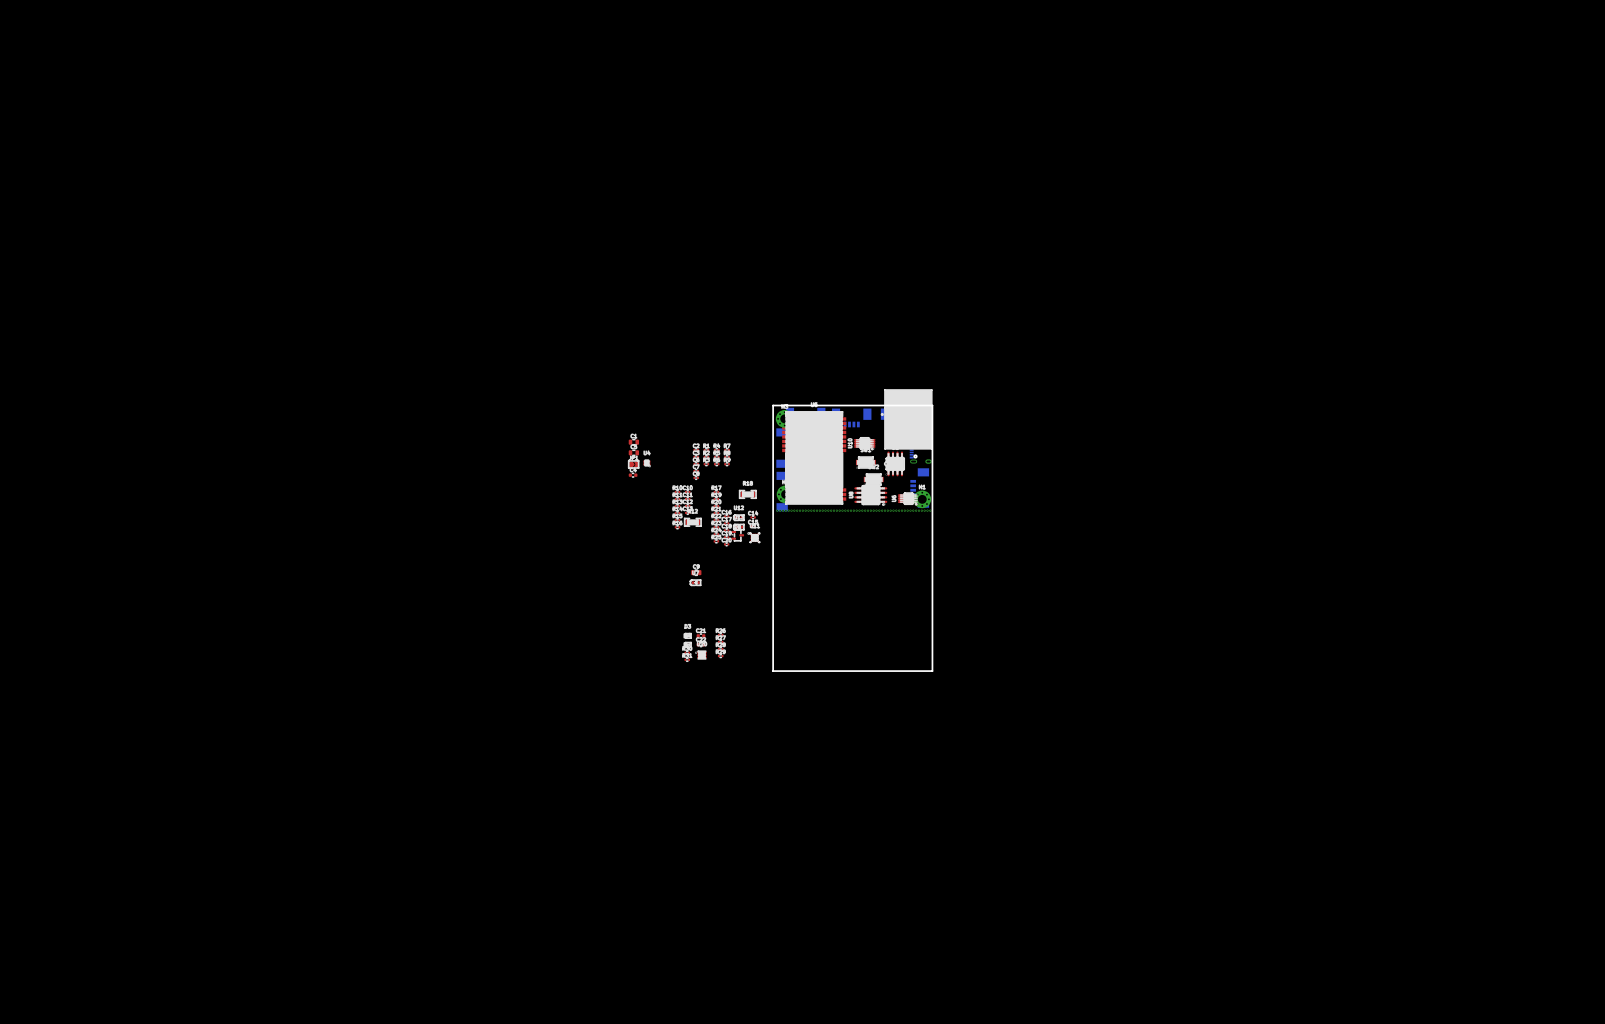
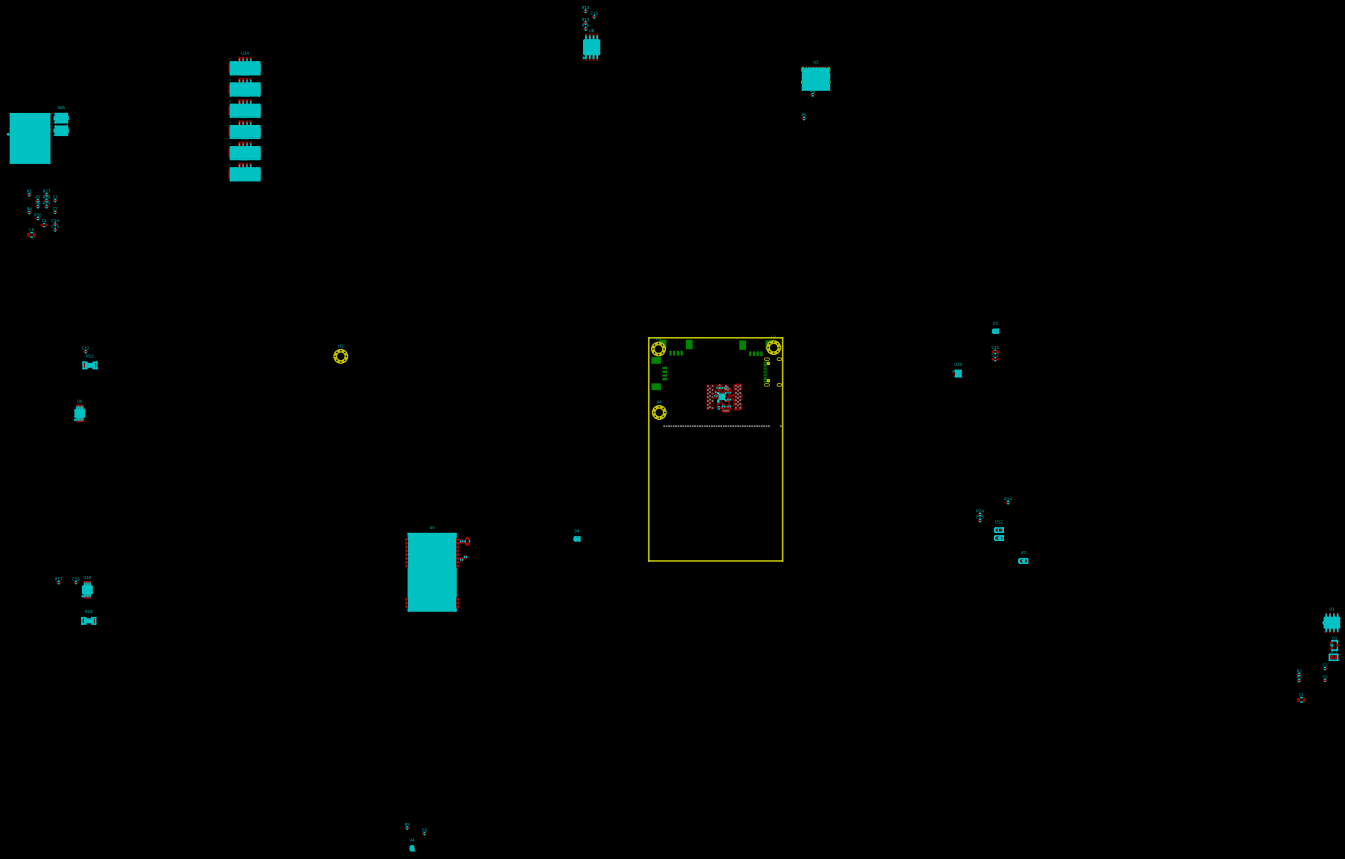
part: none -> (245, 65)
part: none -> (815, 78)
part: none -> (245, 87)
part: none -> (245, 108)
part: none -> (245, 129)
part: none -> (245, 150)
part: none -> (245, 171)
part: (851, 417) -> none
part position: (906, 419) -> (28, 138)
part position: (633, 442) -> (1301, 699)
part rotation: 0° (864, 443) -> 90° clockwise (86, 589)
part position: (864, 443) -> (86, 589)
part position: (696, 450) -> (1325, 668)
part position: (706, 450) -> (29, 194)
part position: (716, 450) -> (29, 212)
part position: (727, 450) -> (37, 200)
part position: (633, 452) -> (31, 234)
part position: (696, 457) -> (55, 200)
part position: (706, 457) -> (1299, 674)
part position: (716, 457) -> (804, 118)
part position: (727, 457) -> (37, 206)
part position: (814, 457) -> (432, 572)
top zone outline: none -> (734, 384) (741, 384) (741, 409) (734, 409) (733, 399) (727, 399) (727, 396) (718, 396) (734, 395) (734, 384)
via: none -> (719, 385)
part position: (865, 462) -> (61, 118)
via: none -> (735, 385)
via: none -> (740, 385)
part position: (646, 463) -> (412, 848)
via: none -> (707, 386)
via: none -> (712, 386)
via: none -> (725, 386)
via: none -> (738, 386)
part position: (894, 463) -> (1331, 622)
part position: (633, 464) -> (1333, 657)
part position: (696, 464) -> (1325, 680)
part position: (706, 464) -> (1299, 680)
part position: (716, 464) -> (812, 94)
part position: (727, 464) -> (407, 827)
via: none -> (727, 387)
via: none -> (710, 388)
part: none -> (718, 387)
part: none -> (721, 387)
via: none -> (724, 387)
via: none -> (728, 388)
top zone outline: none -> (730, 388) (730, 392)
top track: none -> (718, 389) (719, 394)
top track: none -> (721, 389) (721, 394)
top track: none -> (726, 389) (722, 394)
via: none -> (726, 389)
via: none -> (735, 389)
via: none -> (740, 389)
via: none -> (707, 389)
via: none -> (712, 389)
via: none -> (727, 390)
via: none -> (738, 390)
via: none -> (710, 392)
via: none -> (715, 392)
part: none -> (729, 392)
part position: (696, 471) -> (55, 212)
via: none -> (707, 393)
via: none -> (712, 393)
via: none -> (735, 392)
via: none -> (740, 392)
via: none -> (738, 394)
via: none -> (710, 395)
part: none -> (715, 395)
part position: (633, 475) -> (44, 225)
via: none -> (735, 396)
via: none -> (740, 396)
via: none -> (707, 397)
via: none -> (712, 397)
part: none -> (721, 397)
part position: (696, 477) -> (424, 833)
via: none -> (738, 398)
via: none -> (710, 399)
part: none -> (729, 399)
top track: none -> (719, 399) (717, 407)
top track: none -> (721, 399) (723, 404) (720, 407)
top track: none -> (724, 399) (729, 401) (729, 404)
part position: (873, 479) -> (61, 130)
via: none -> (735, 400)
via: none -> (740, 400)
via: none -> (707, 401)
via: none -> (712, 401)
via: none -> (738, 401)
via: none -> (710, 403)
via: none -> (735, 404)
via: none -> (740, 404)
via: none -> (707, 404)
via: none -> (738, 405)
via: none -> (710, 406)
top zone outline: none -> (722, 406) (730, 406) (730, 409) (728, 411) (722, 411) (722, 406)
part: none -> (723, 406)
part: none -> (729, 406)
part: none -> (718, 407)
via: none -> (735, 407)
via: none -> (740, 407)
part: (919, 488) -> none
via: none -> (707, 408)
via: none -> (712, 408)
part: (785, 491) -> none
part: (677, 492) -> none
part: (687, 492) -> none
part position: (716, 492) -> (58, 582)
via: none -> (723, 410)
via: none -> (726, 410)
via: none -> (728, 410)
part position: (747, 494) -> (88, 620)
part rotation: 0° (870, 495) -> 90° clockwise (591, 47)
part position: (870, 495) -> (591, 47)
part: (677, 499) -> none
part: (687, 499) -> none
part: (716, 499) -> none
part rotation: 0° (908, 499) -> 90° clockwise (79, 413)
part position: (908, 499) -> (79, 413)
part position: (922, 499) -> (340, 356)
part position: (687, 505) -> (85, 351)
part position: (677, 506) -> (585, 11)
part: (716, 506) -> none
via: (777, 510) -> none
via: (780, 510) -> none
via: (783, 510) -> none
via: (785, 510) -> none
via: (788, 510) -> none
via: (918, 510) -> none
via: (921, 510) -> none
via: (924, 510) -> none
via: (927, 510) -> none
part position: (687, 512) -> (594, 16)
part position: (677, 513) -> (1008, 502)
part: (716, 513) -> none
part position: (726, 516) -> (75, 582)
part position: (738, 517) -> (998, 530)
part position: (753, 517) -> (55, 224)
part position: (677, 520) -> (585, 22)
part: (716, 520) -> none
part position: (692, 522) -> (90, 365)
part: (726, 523) -> none
part footprint: [733, 524, 745, 531] -> [994, 535, 1004, 541]
part position: (753, 526) -> (55, 229)
part position: (677, 527) -> (585, 28)
part: (716, 527) -> none
part: (726, 530) -> none
part position: (716, 534) -> (980, 514)
part position: (737, 535) -> (1334, 645)
part: (726, 537) -> none
part: (753, 537) -> none
part position: (716, 541) -> (980, 520)
part: (726, 544) -> none
part: (696, 572) -> none
part position: (695, 582) -> (1023, 560)
part position: (720, 634) -> (37, 218)
part position: (687, 635) -> (995, 331)
part position: (700, 635) -> (995, 351)
part position: (720, 641) -> (46, 194)
part position: (700, 644) -> (995, 359)
part: none -> (461, 541)
part: none -> (467, 541)
part position: (720, 649) -> (46, 200)
top track: none -> (455, 543) (467, 544)
part: (687, 652) -> none
part position: (701, 655) -> (957, 373)
part position: (720, 656) -> (46, 206)
part: (687, 659) -> none
part: none -> (465, 556)
top track: none -> (455, 558) (465, 558)
part: none -> (461, 559)

